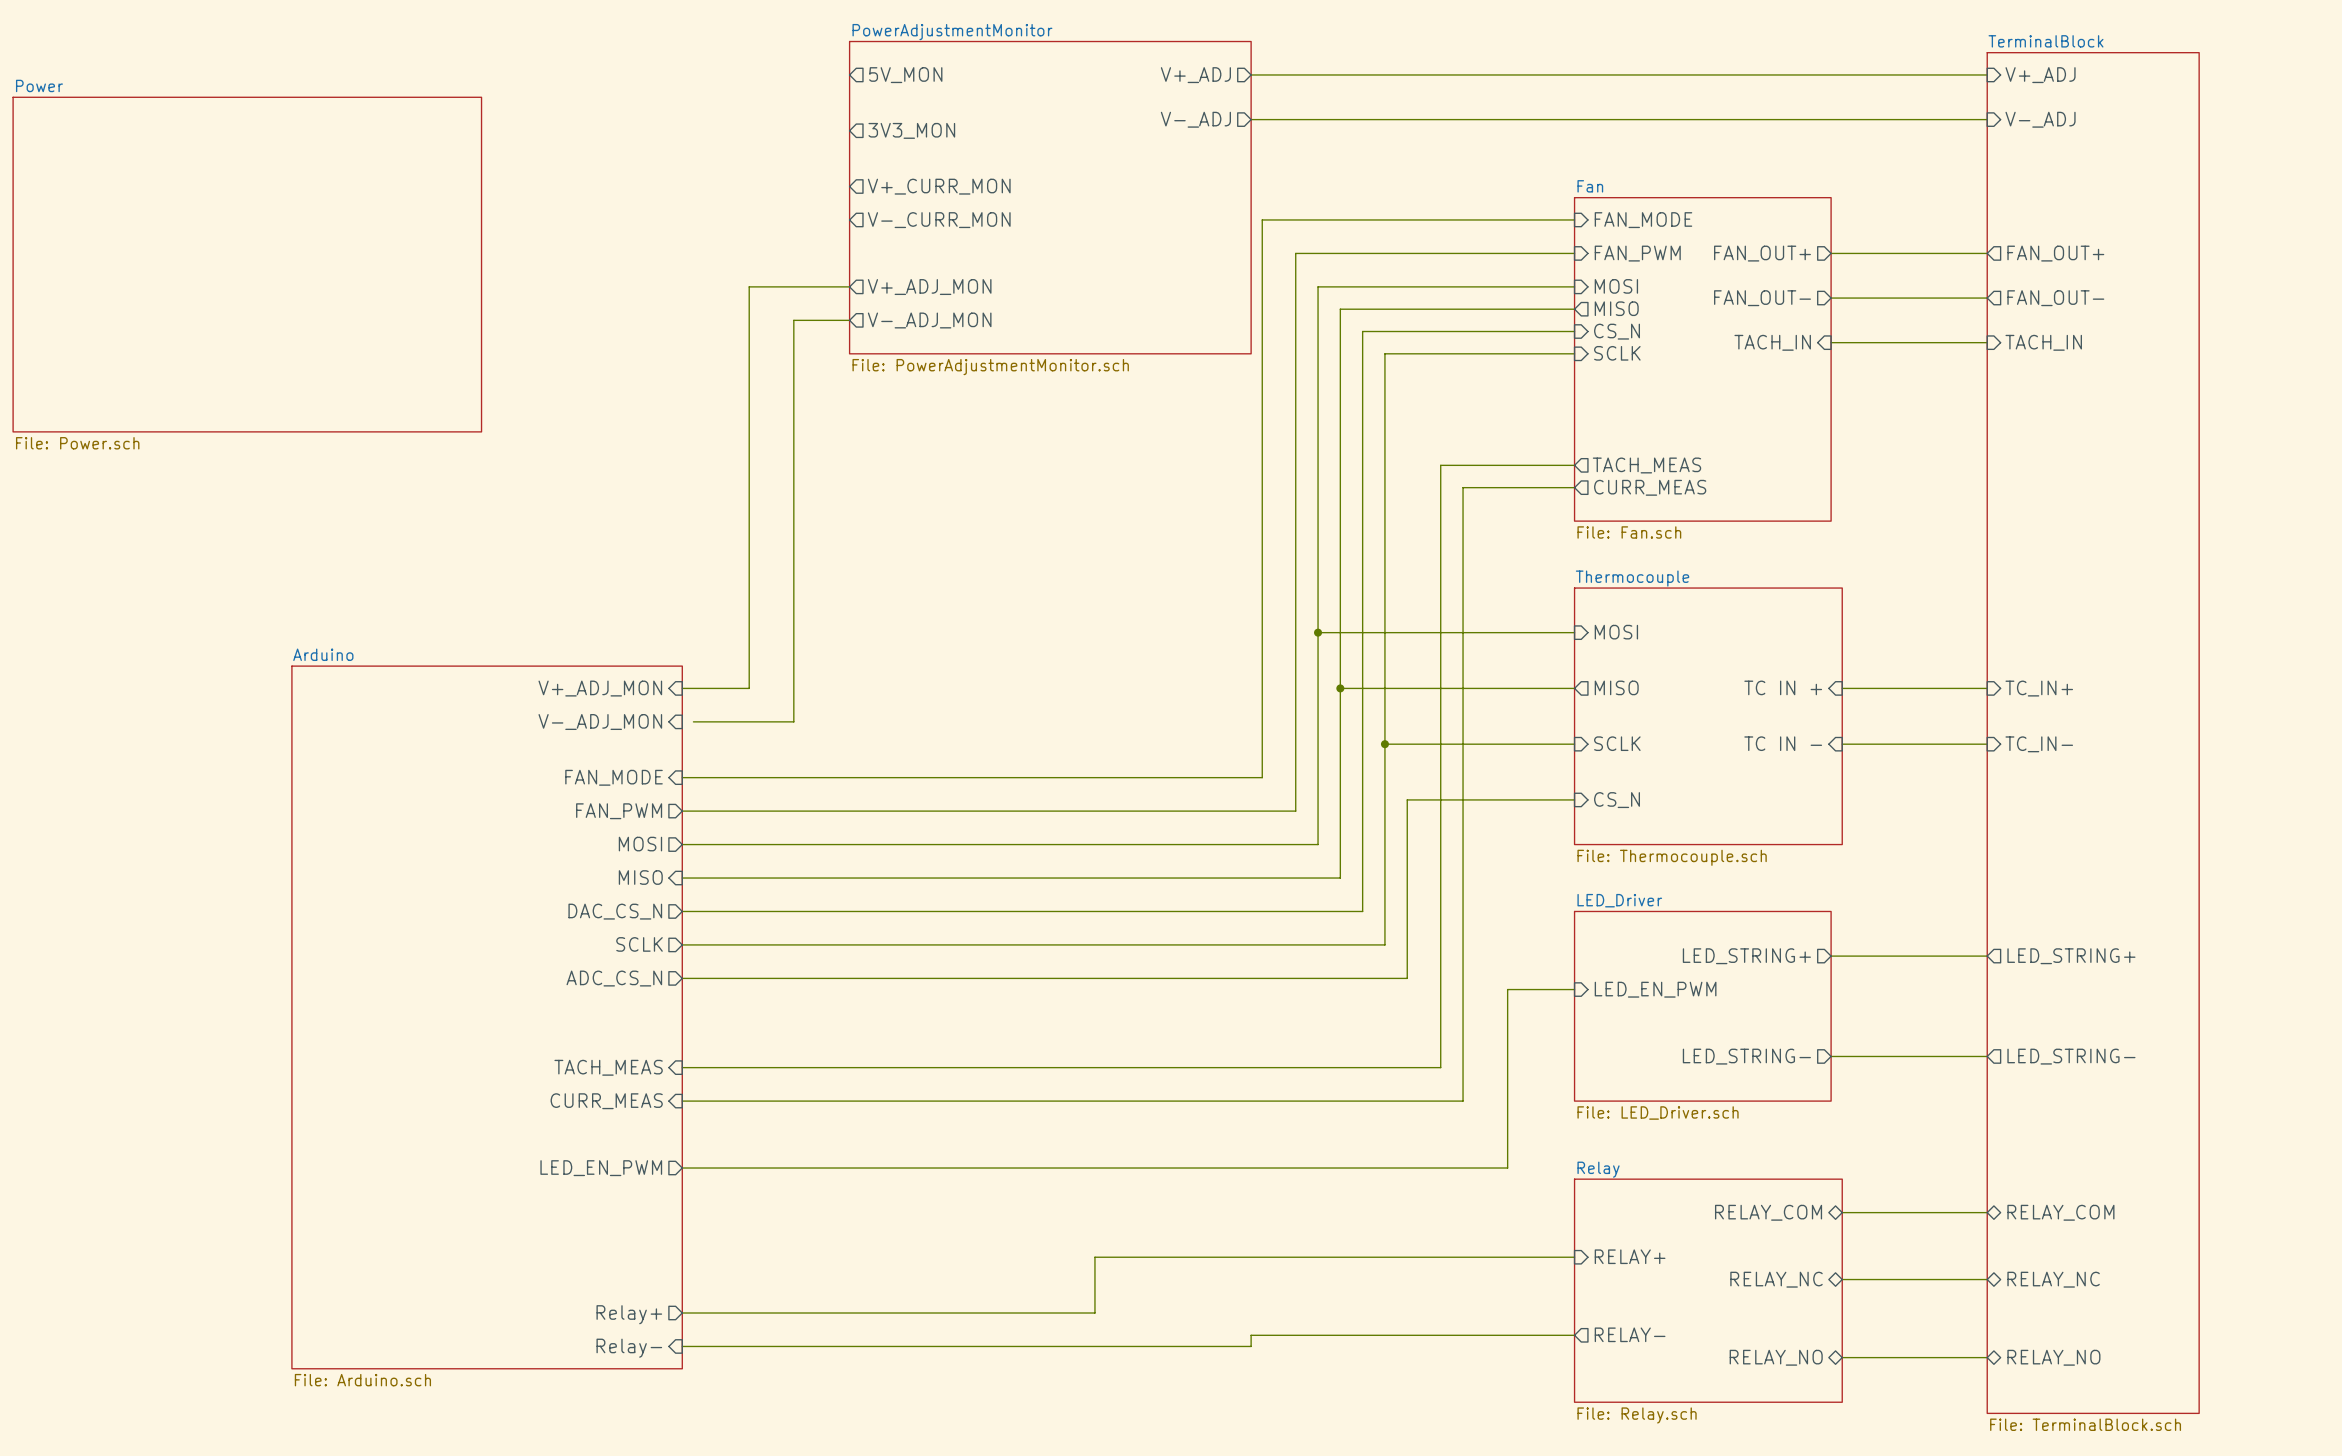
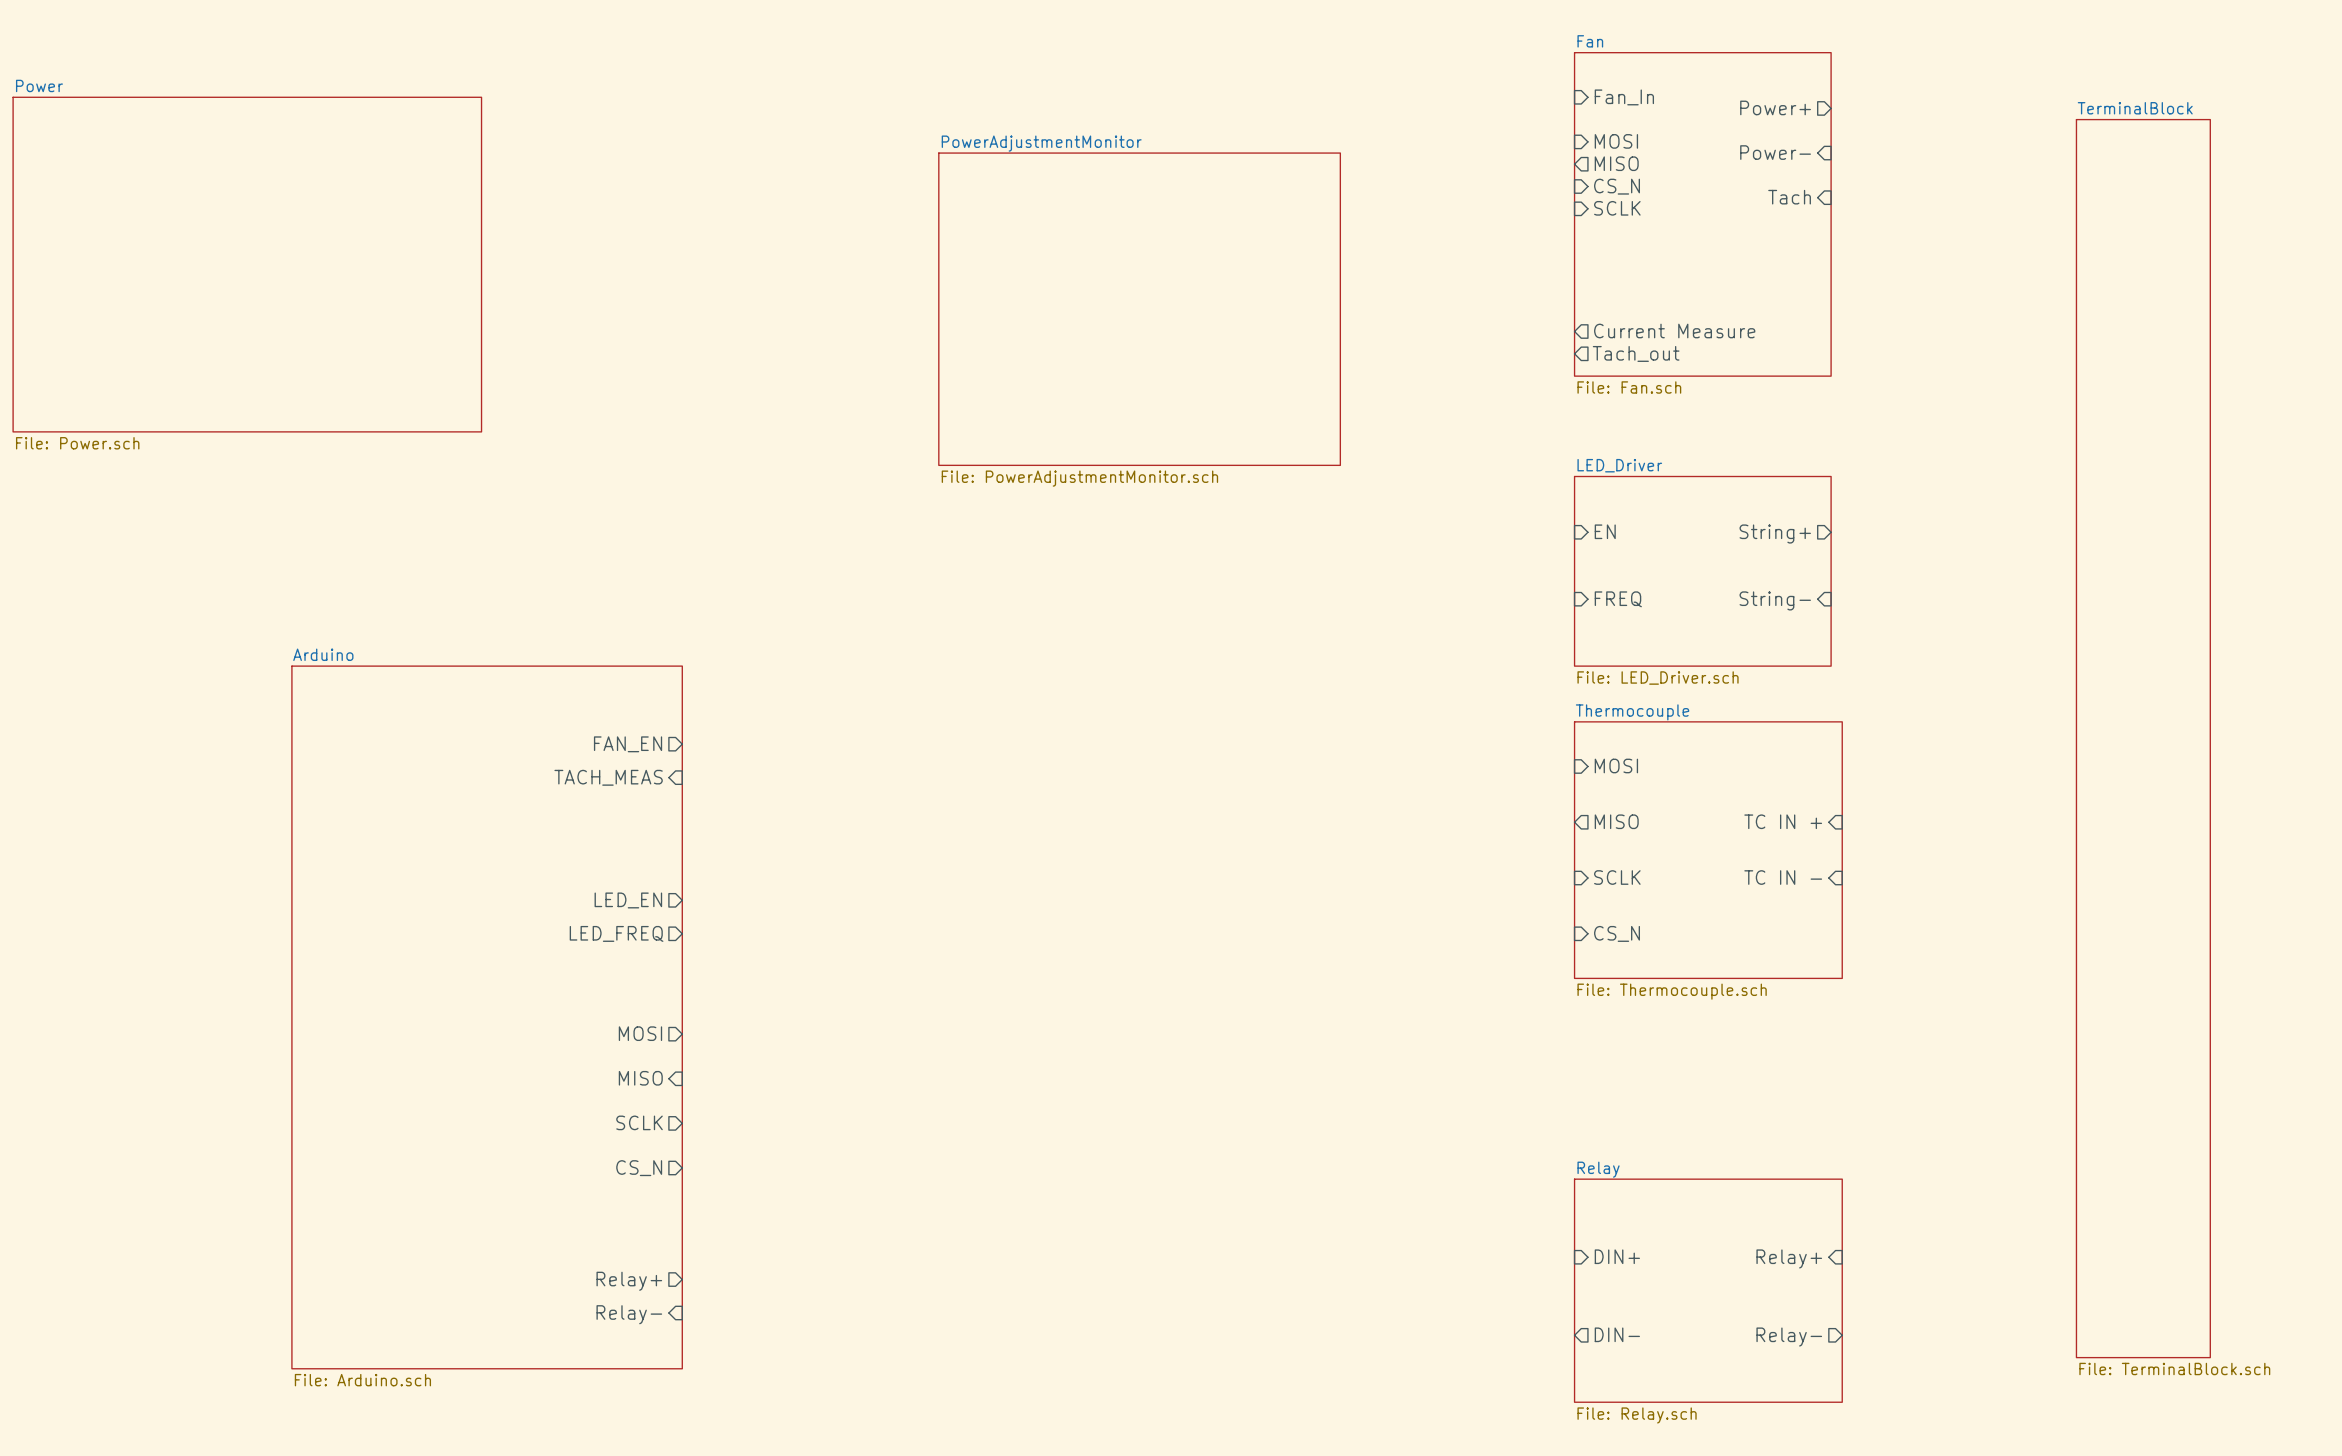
wire: (1251, 74) (1987, 74) -> none
sheet pin: 5V_MON (905, 75) -> none
sheet pin: V+_ADJ (1195, 75) -> none
sheet pin: V+_ADJ (2040, 75) -> none
sheet pin: none -> Fan_In (1624, 97)
sheet pin: none -> Power+ (1775, 107)
sheet pin: V-_ADJ (1195, 119) -> none
wire: (1251, 119) (1987, 119) -> none
sheet pin: V-_ADJ (2040, 119) -> none
sheet pin: 3V3_MON (911, 130) -> none
sheet pin: none -> Power- (1775, 152)
sheet pin: V+_CURR_MON (939, 186) -> none
sheet pin: none -> CS_N (1617, 186)
sheet PowerAdjustmentMonitor position: (1050, 197) -> (1139, 309)
sheet pin: none -> Tach (1789, 197)
sheet pin: none -> SCLK (1617, 208)
wire: (1574, 219) (1262, 219) (1262, 777) (682, 777) -> none
sheet pin: V-_CURR_MON (939, 220) -> none
sheet pin: FAN_MODE (1643, 220) -> none
wire: (1574, 253) (1295, 253) (1295, 811) (682, 811) -> none
sheet pin: FAN_PWM (1637, 253) -> none
sheet pin: FAN_OUT+ (1762, 253) -> none
wire: (1831, 253) (1987, 253) -> none
sheet pin: FAN_OUT+ (2055, 253) -> none
wire: (849, 286) (749, 286) (749, 688) (682, 688) -> none
wire: (1574, 286) (1318, 286) (1318, 844) (682, 844) -> none
sheet pin position: MOSI (1616, 286) -> MOSI (1616, 141)
sheet pin: V+_ADJ_MON (929, 287) -> none
sheet pin: FAN_OUT- (1762, 298) -> none
wire: (1831, 298) (1987, 298) -> none
sheet pin: FAN_OUT- (2055, 298) -> none
sheet pin position: MISO (1616, 308) -> MISO (1616, 163)
wire: (1574, 309) (1340, 309) (1340, 878) (682, 878) -> none
wire: (849, 320) (793, 320) (793, 721) (693, 721) -> none
sheet pin: V-_ADJ_MON (929, 320) -> none
wire: (1574, 331) (1362, 331) (1362, 911) (682, 911) -> none
sheet pin shape: input (1617, 331) -> output (1674, 331)
sheet pin: CS_N (1617, 331) -> Current Measure (1674, 331)
sheet pin: TACH_IN (1772, 342) -> none
wire: (1831, 342) (1987, 342) -> none
sheet pin: TACH_IN (2043, 342) -> none
wire: (1574, 353) (1384, 353) (1384, 944) (682, 944) -> none
sheet pin shape: input (1617, 353) -> output (1636, 353)
sheet pin: SCLK (1617, 353) -> Tach_out (1636, 353)
sheet Fan position: (1702, 359) -> (1702, 214)
wire: (1574, 465) (1440, 465) (1440, 1067) (682, 1067) -> none
sheet pin: TACH_MEAS (1646, 465) -> none
wire: (1574, 487) (1463, 487) (1463, 1101) (682, 1101) -> none
sheet pin: CURR_MEAS (1650, 487) -> none
sheet pin: none -> EN (1605, 531)
sheet pin: none -> String+ (1775, 534)
sheet LED_Driver: none -> File: LED_Driver.sch (1702, 571)
sheet pin: none -> FREQ (1618, 599)
sheet pin: none -> String- (1775, 600)
wire: (1318, 632) (1574, 632) -> none
junction: (1318, 632) -> none
sheet pin position: MOSI (1616, 632) -> MOSI (1616, 765)
sheet pin position: MISO (1616, 687) -> MISO (1616, 821)
sheet pin position: TC IN + (1783, 687) -> TC IN + (1783, 821)
sheet pin: V+_ADJ_MON (600, 688) -> none
wire: (1340, 688) (1574, 688) -> none
junction: (1340, 688) -> none
wire: (1842, 688) (1987, 688) -> none
sheet pin: TC_IN+ (2039, 688) -> none
sheet Thermocouple position: (1708, 716) -> (1708, 850)
sheet pin: V-_ADJ_MON (600, 722) -> none
sheet TerminalBlock: File: TerminalBlock.sch (2093, 733) -> none
sheet TerminalBlock: none -> File: TerminalBlock.sch (2143, 738)
sheet pin position: SCLK (1617, 743) -> SCLK (1617, 877)
sheet pin position: TC IN - (1783, 743) -> TC IN - (1783, 877)
sheet pin: none -> FAN_EN (628, 744)
wire: (1384, 744) (1574, 744) -> none
junction: (1384, 744) -> none
wire: (1842, 744) (1987, 744) -> none
sheet pin: TC_IN- (2039, 744) -> none
sheet pin: FAN_MODE (614, 777) -> TACH_MEAS (608, 777)
wire: (1574, 799) (1407, 799) (1407, 978) (682, 978) -> none
sheet pin position: CS_N (1617, 800) -> CS_N (1617, 933)
sheet pin: FAN_PWM (619, 811) -> none
sheet pin position: MOSI (640, 844) -> MOSI (640, 1033)
sheet pin position: MISO (640, 877) -> MISO (640, 1078)
sheet pin: none -> LED_EN (628, 900)
sheet pin: DAC_CS_N (615, 911) -> none
sheet pin: none -> LED_FREQ (616, 933)
sheet pin position: SCLK (639, 944) -> SCLK (639, 1122)
sheet pin: LED_STRING+ (1746, 956) -> none
wire: (1831, 956) (1987, 956) -> none
sheet pin: LED_STRING+ (2071, 956) -> none
sheet pin: ADC_CS_N (614, 978) -> none
wire: (1574, 989) (1507, 989) (1507, 1168) (682, 1168) -> none
sheet pin: LED_EN_PWM (1655, 989) -> none
sheet LED_Driver: File: LED_Driver.sch (1702, 1006) -> none
sheet pin: LED_STRING- (1746, 1056) -> none
wire: (1831, 1056) (1987, 1056) -> none
sheet pin: LED_STRING- (2071, 1056) -> none
sheet pin: TACH_MEAS (608, 1067) -> none
sheet pin: CURR_MEAS (606, 1101) -> none
sheet pin: LED_EN_PWM (601, 1168) -> CS_N (639, 1168)
sheet pin: RELAY_COM (1768, 1212) -> none
wire: (1842, 1212) (1987, 1212) -> none
sheet pin: RELAY_COM (2060, 1212) -> none
sheet pin: RELAY+ (1630, 1256) -> DIN+ (1617, 1256)
wire: (1574, 1257) (1094, 1257) (1094, 1313) (682, 1313) -> none
sheet pin: none -> Relay+ (1789, 1258)
sheet pin: RELAY_NC (1776, 1279) -> none
wire: (1842, 1279) (1987, 1279) -> none
sheet pin: RELAY_NC (2053, 1279) -> none
sheet pin: none -> Relay+ (629, 1281)
sheet pin shape: output (629, 1314) -> input (629, 1314)
sheet pin: Relay+ (629, 1314) -> Relay- (629, 1314)
sheet pin: RELAY- (1630, 1334) -> DIN- (1617, 1334)
wire: (1574, 1335) (1251, 1335) (1251, 1346) (682, 1346) -> none
sheet pin: none -> Relay- (1789, 1337)
sheet pin: Relay- (629, 1348) -> none
sheet pin: RELAY_NO (1776, 1357) -> none
wire: (1842, 1357) (1987, 1357) -> none
sheet pin: RELAY_NO (2053, 1357) -> none

